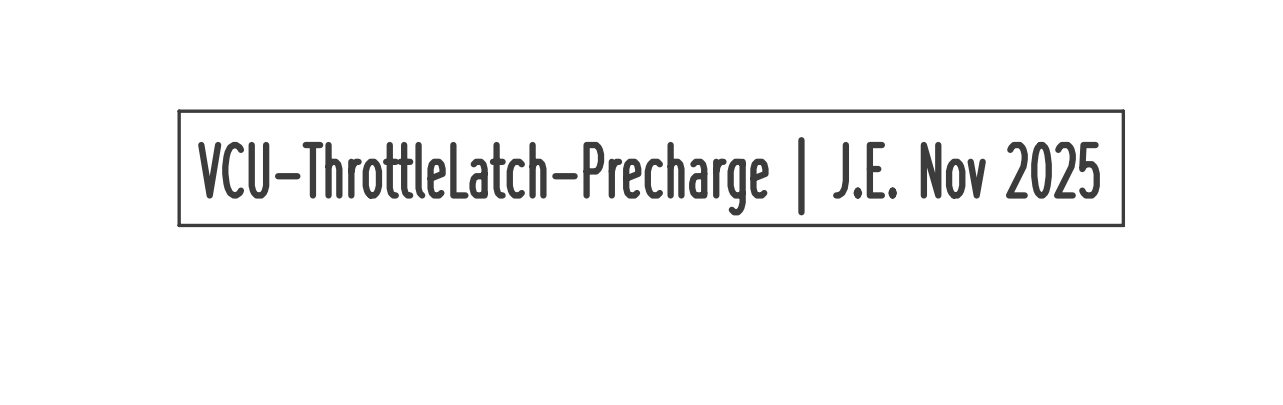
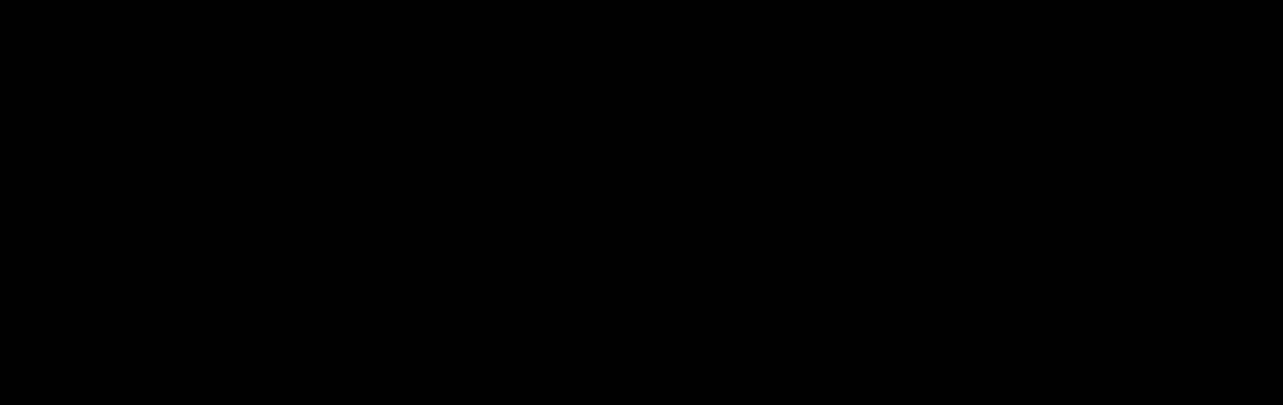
line: (179, 111) (1123, 111) (1123, 225) (179, 225) (179, 111) -> none
text: VCU-ThrottleLatch-Precharge | J.E. Nov 2025 (649, 176) -> none

